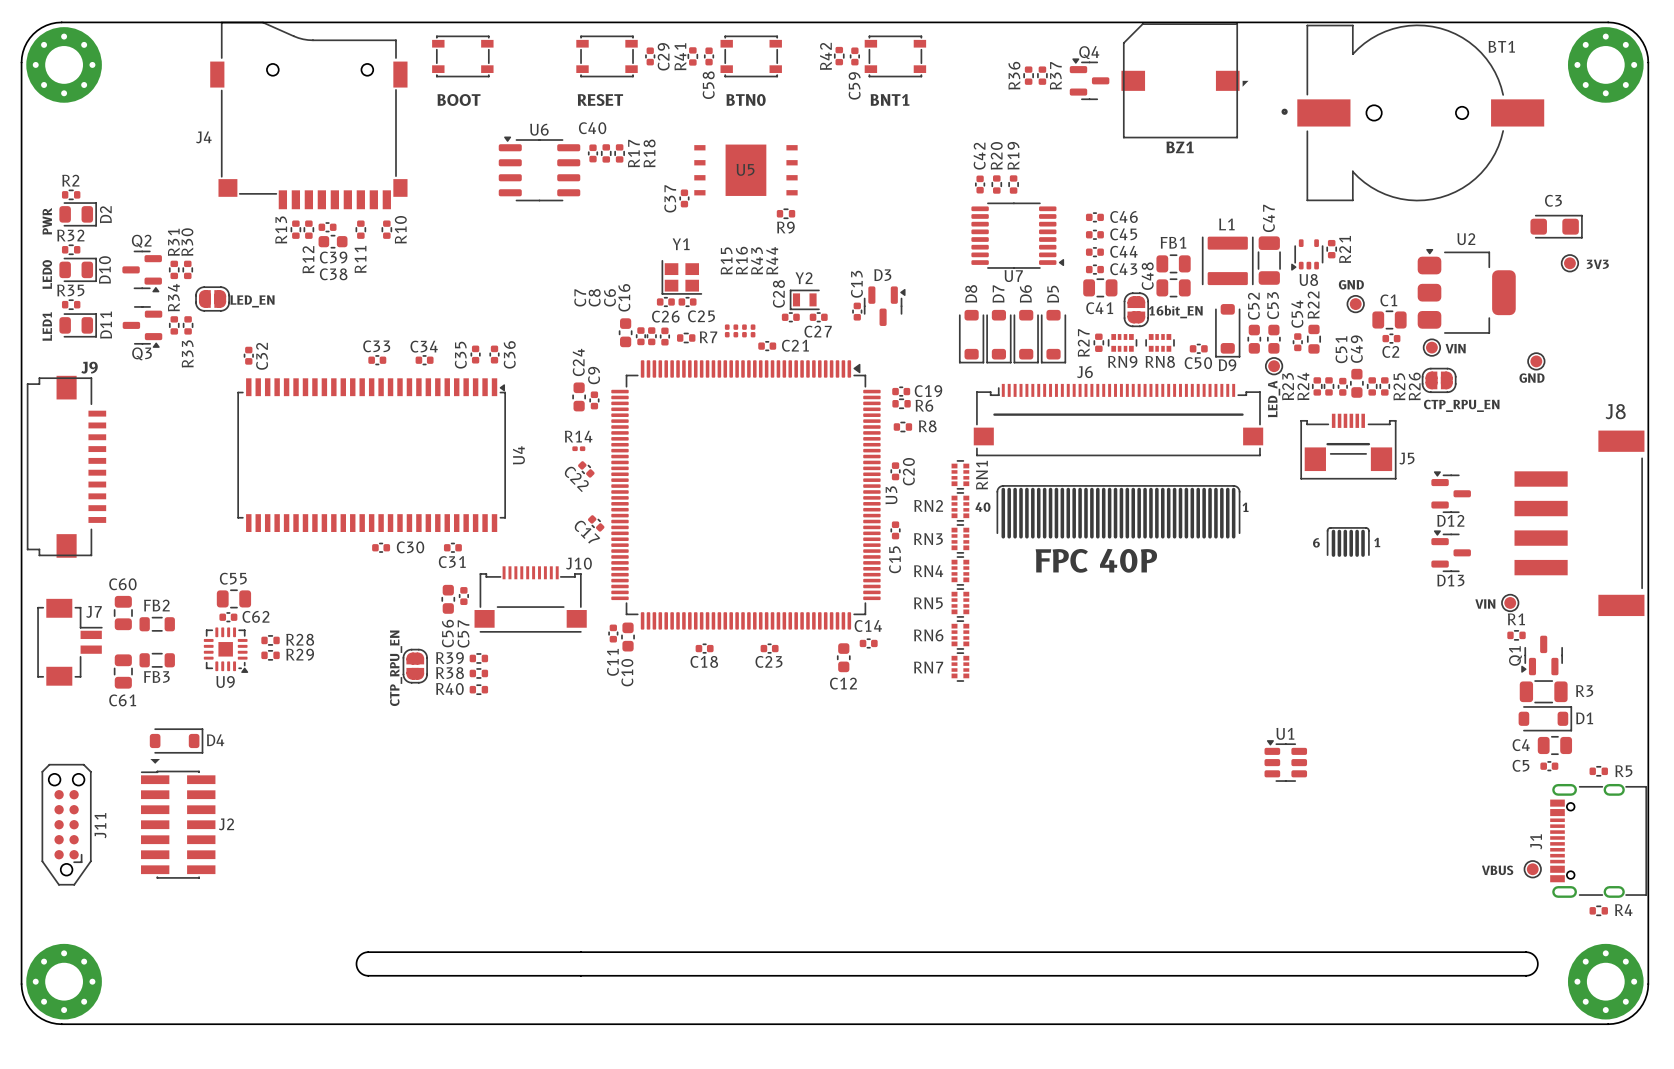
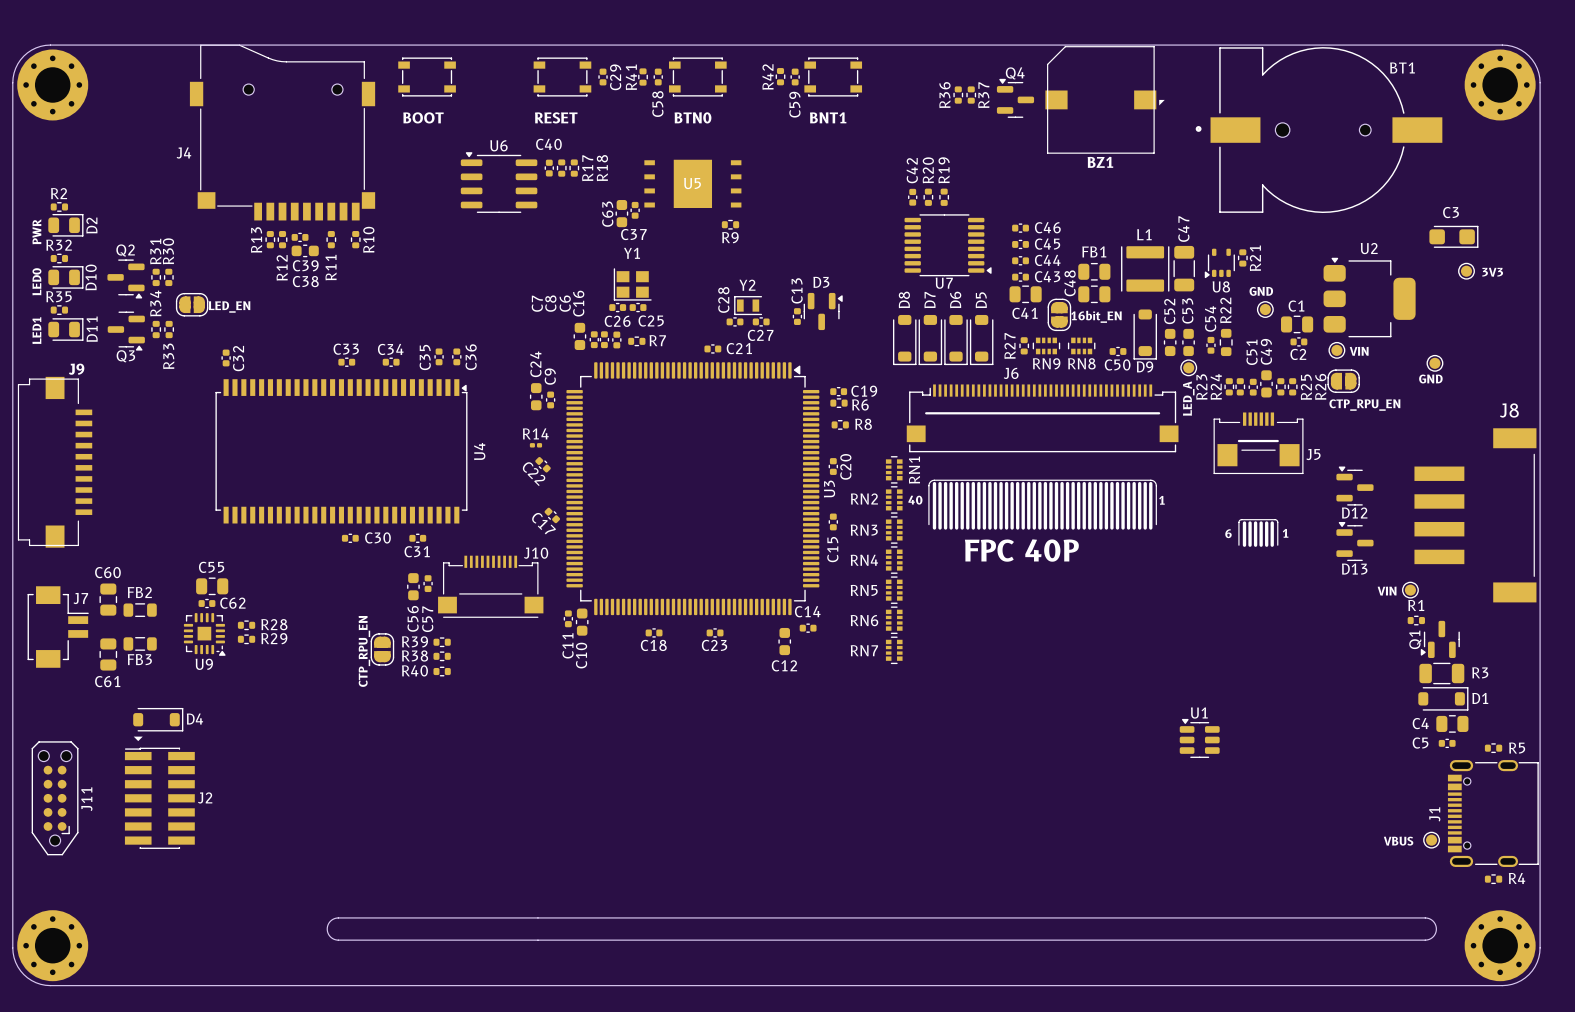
C37 name rotation: 0° (670, 198) -> 90° clockwise (633, 234)
C63: none -> (621, 213)
R15: (727, 330) -> none
R16: (735, 330) -> none
R43: (744, 330) -> none
R44: (753, 330) -> none

